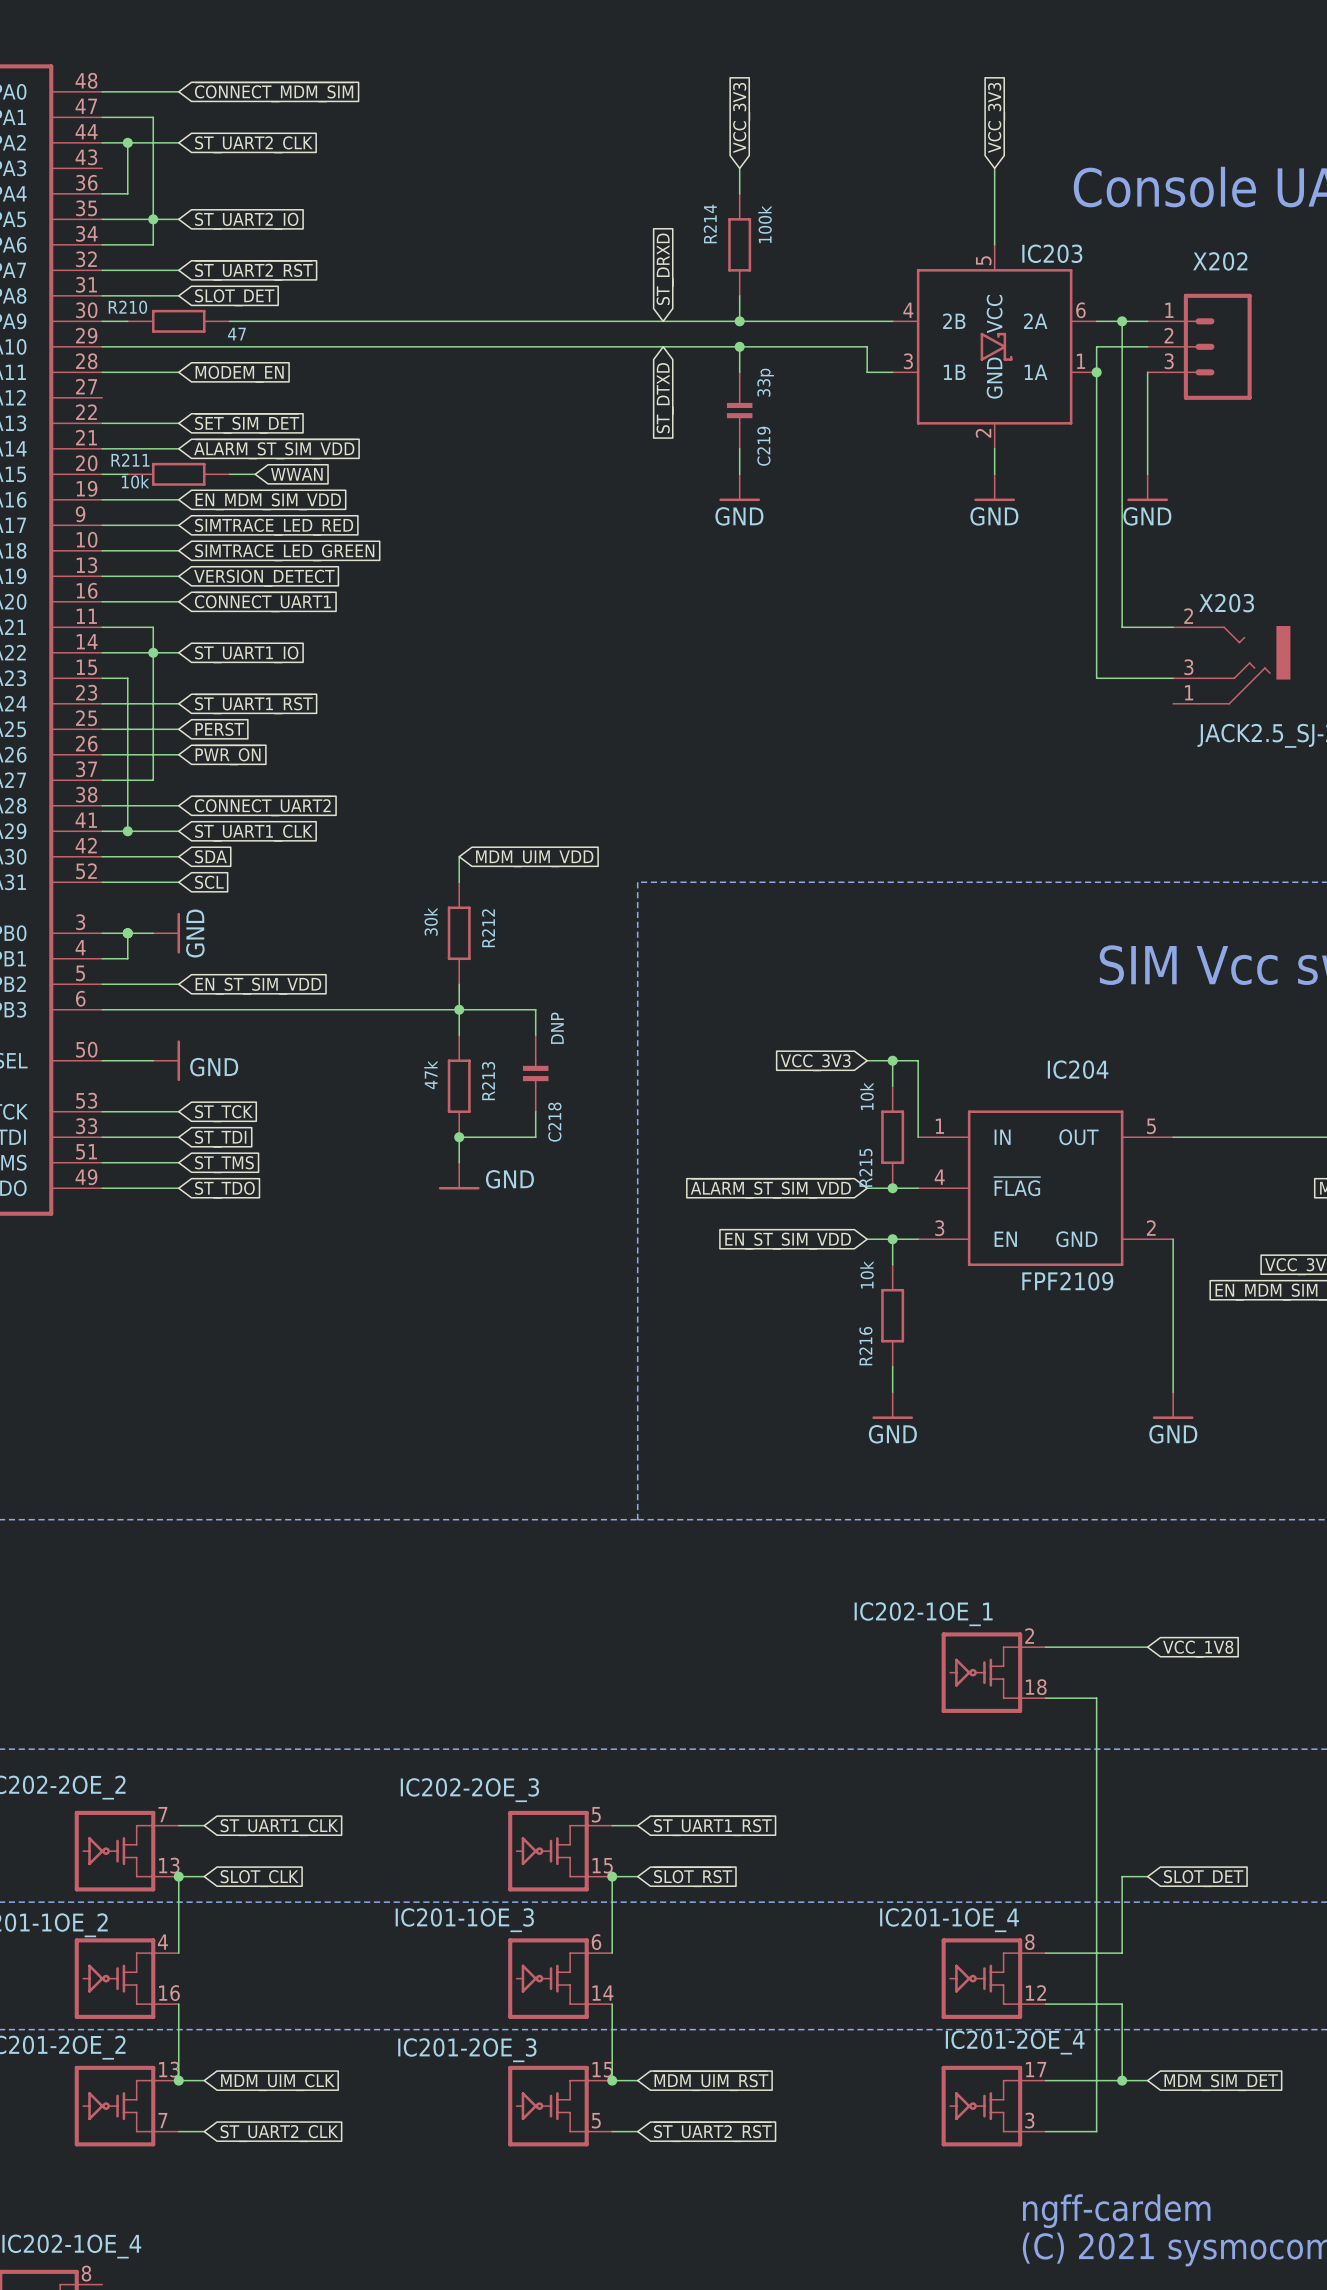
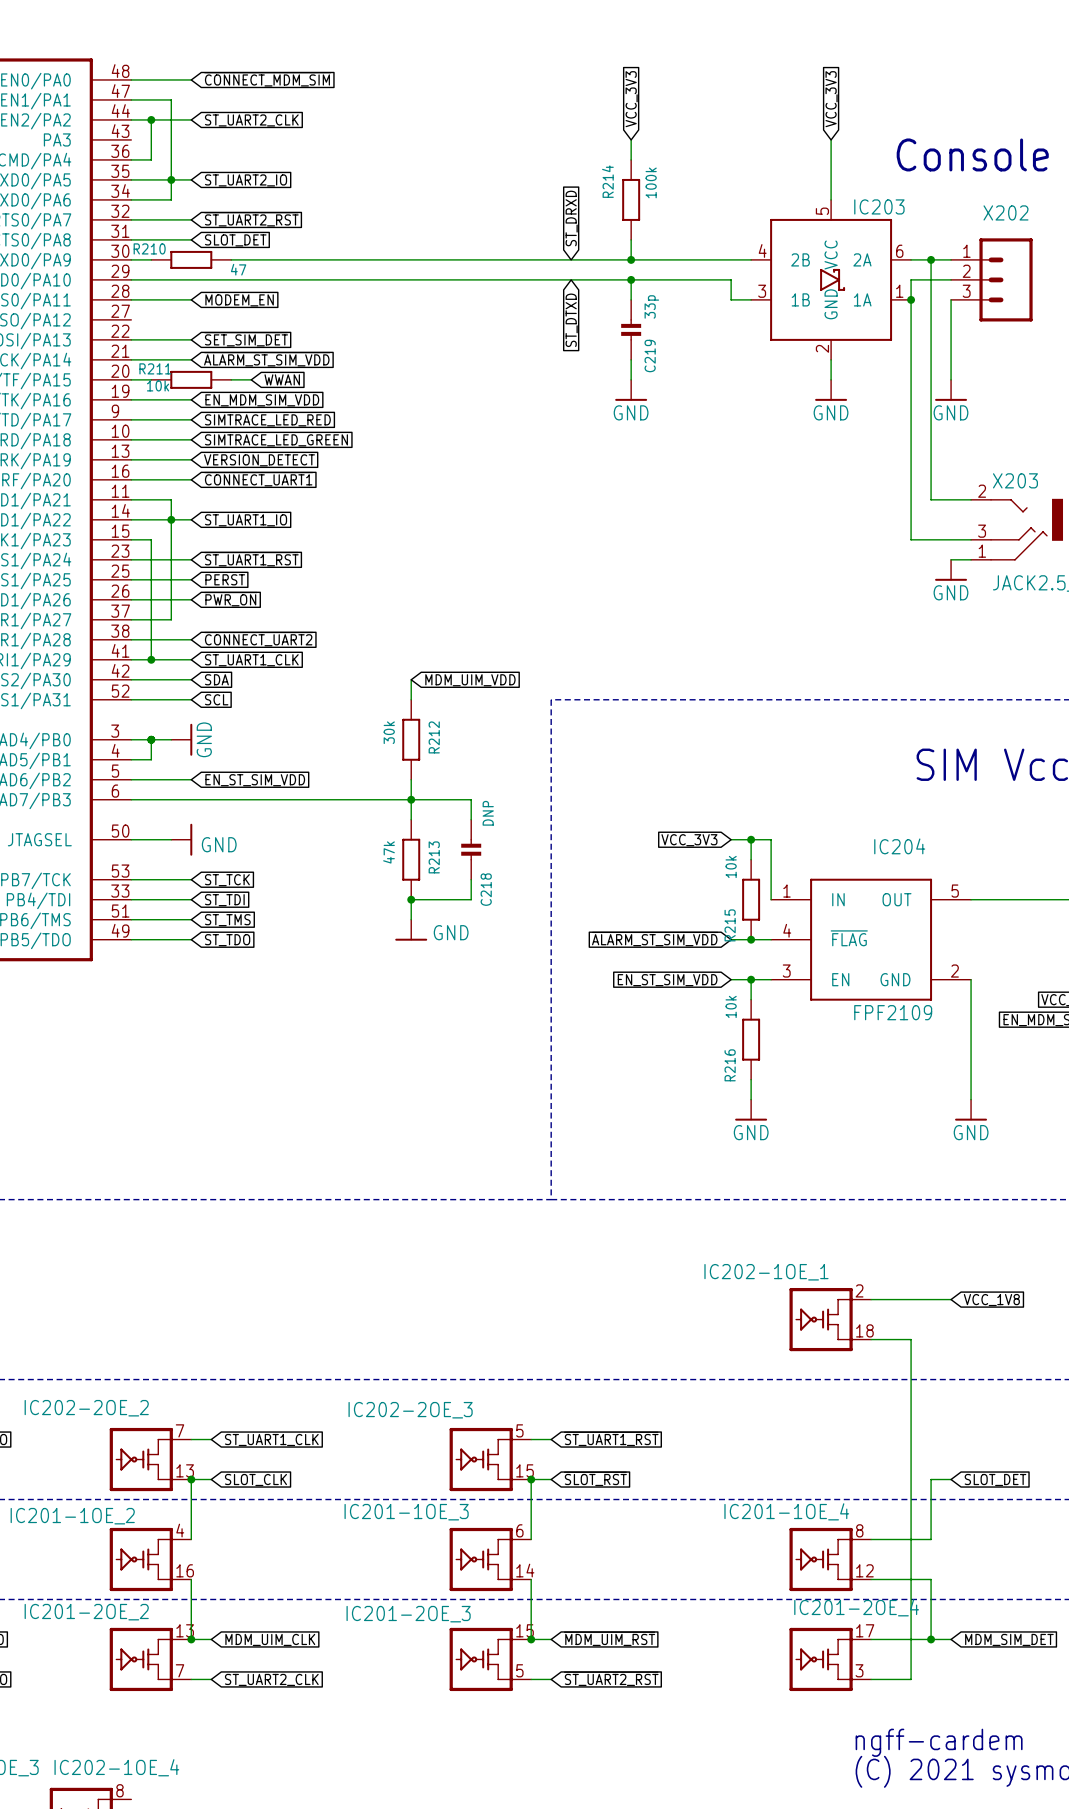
wire: none -> (951, 559) (971, 559)
power symbol: none -> GND (951, 570)

